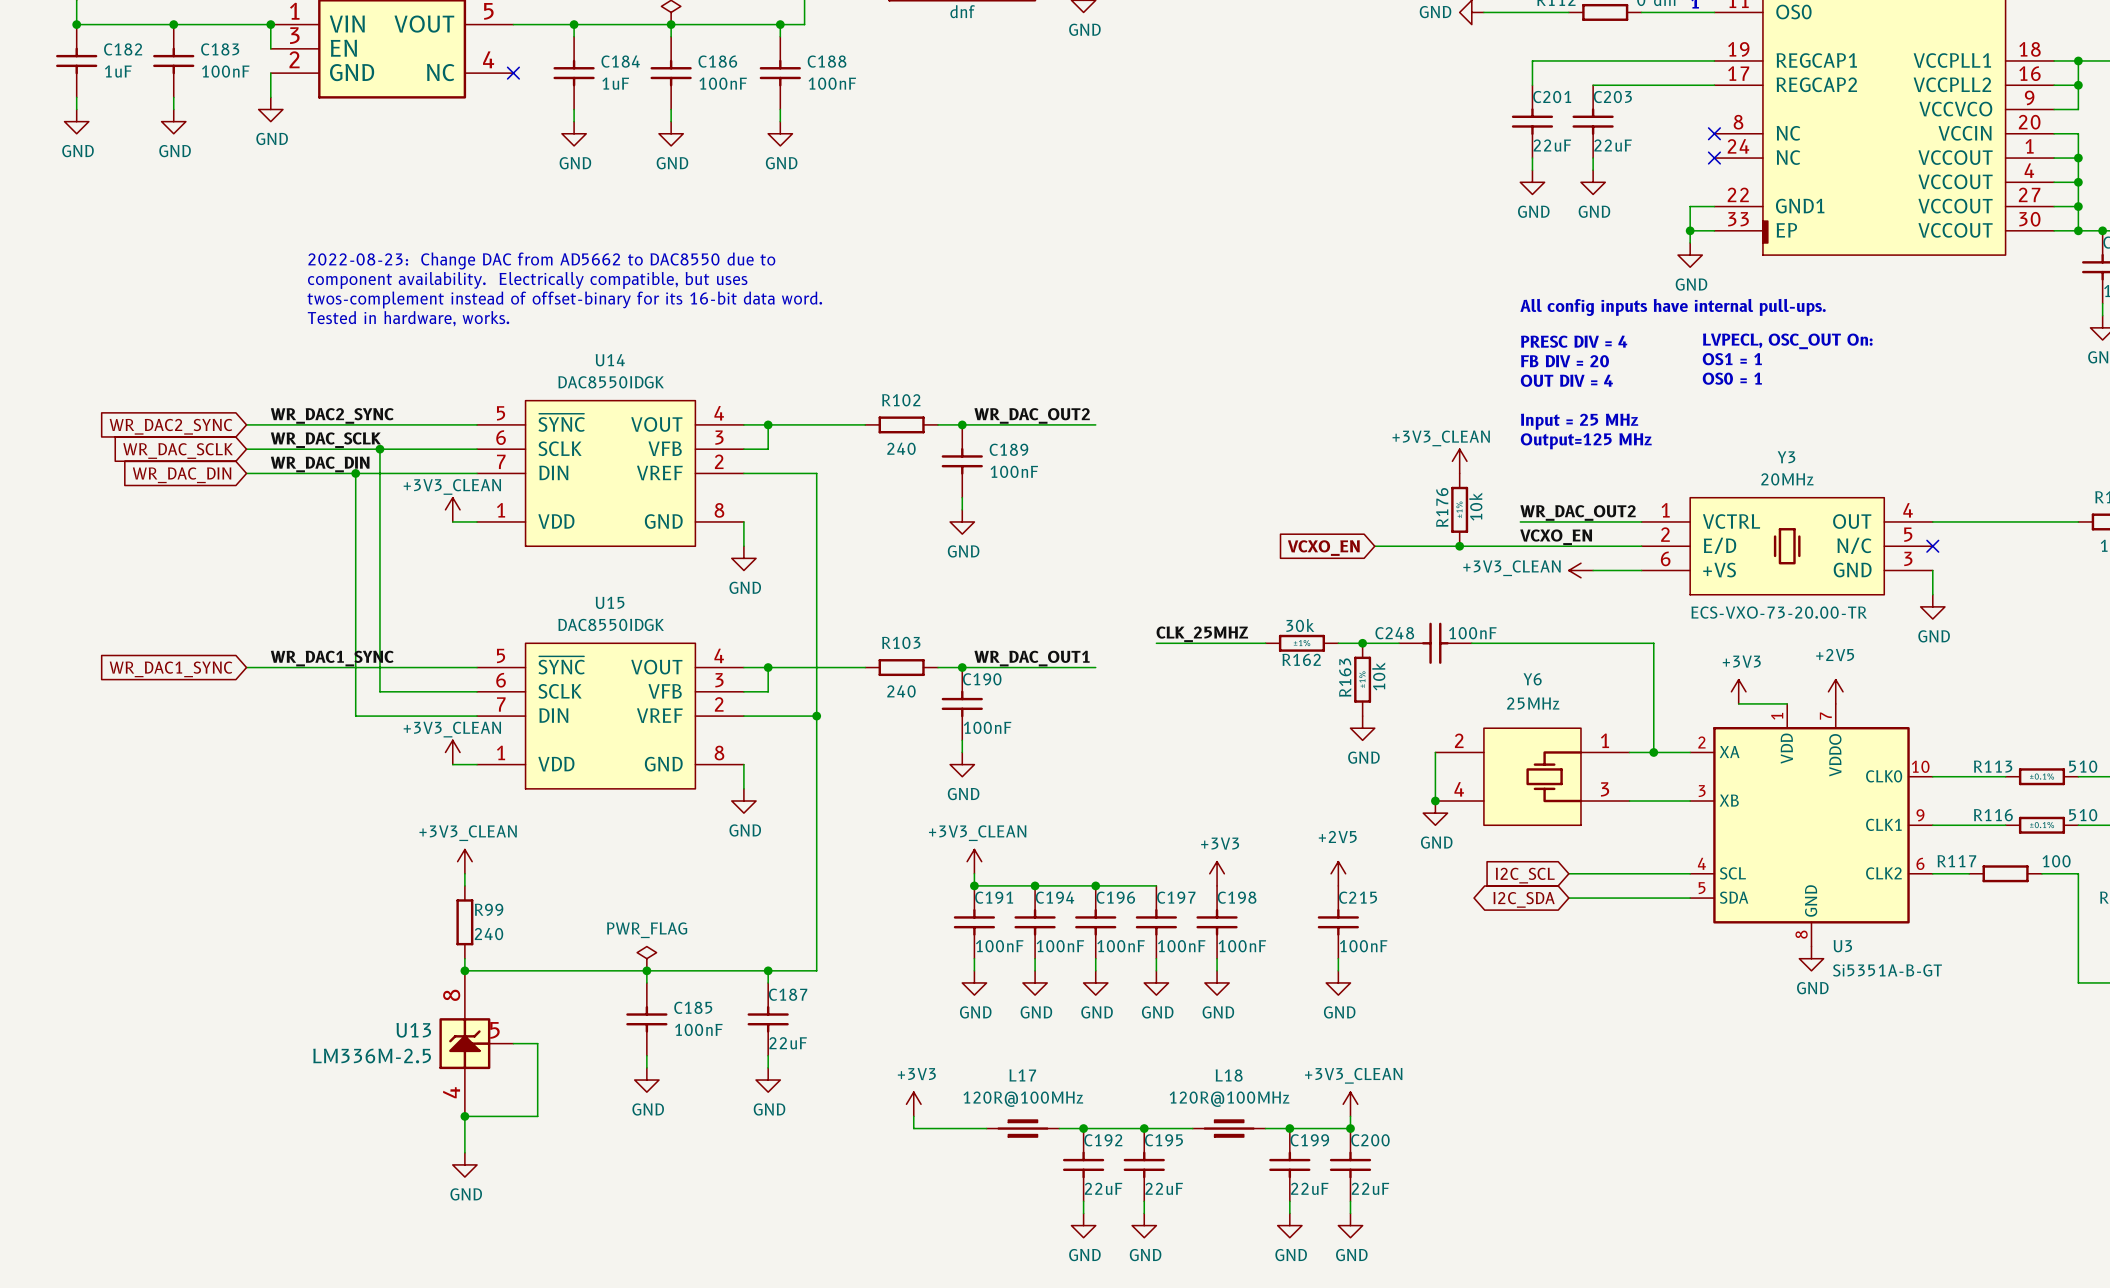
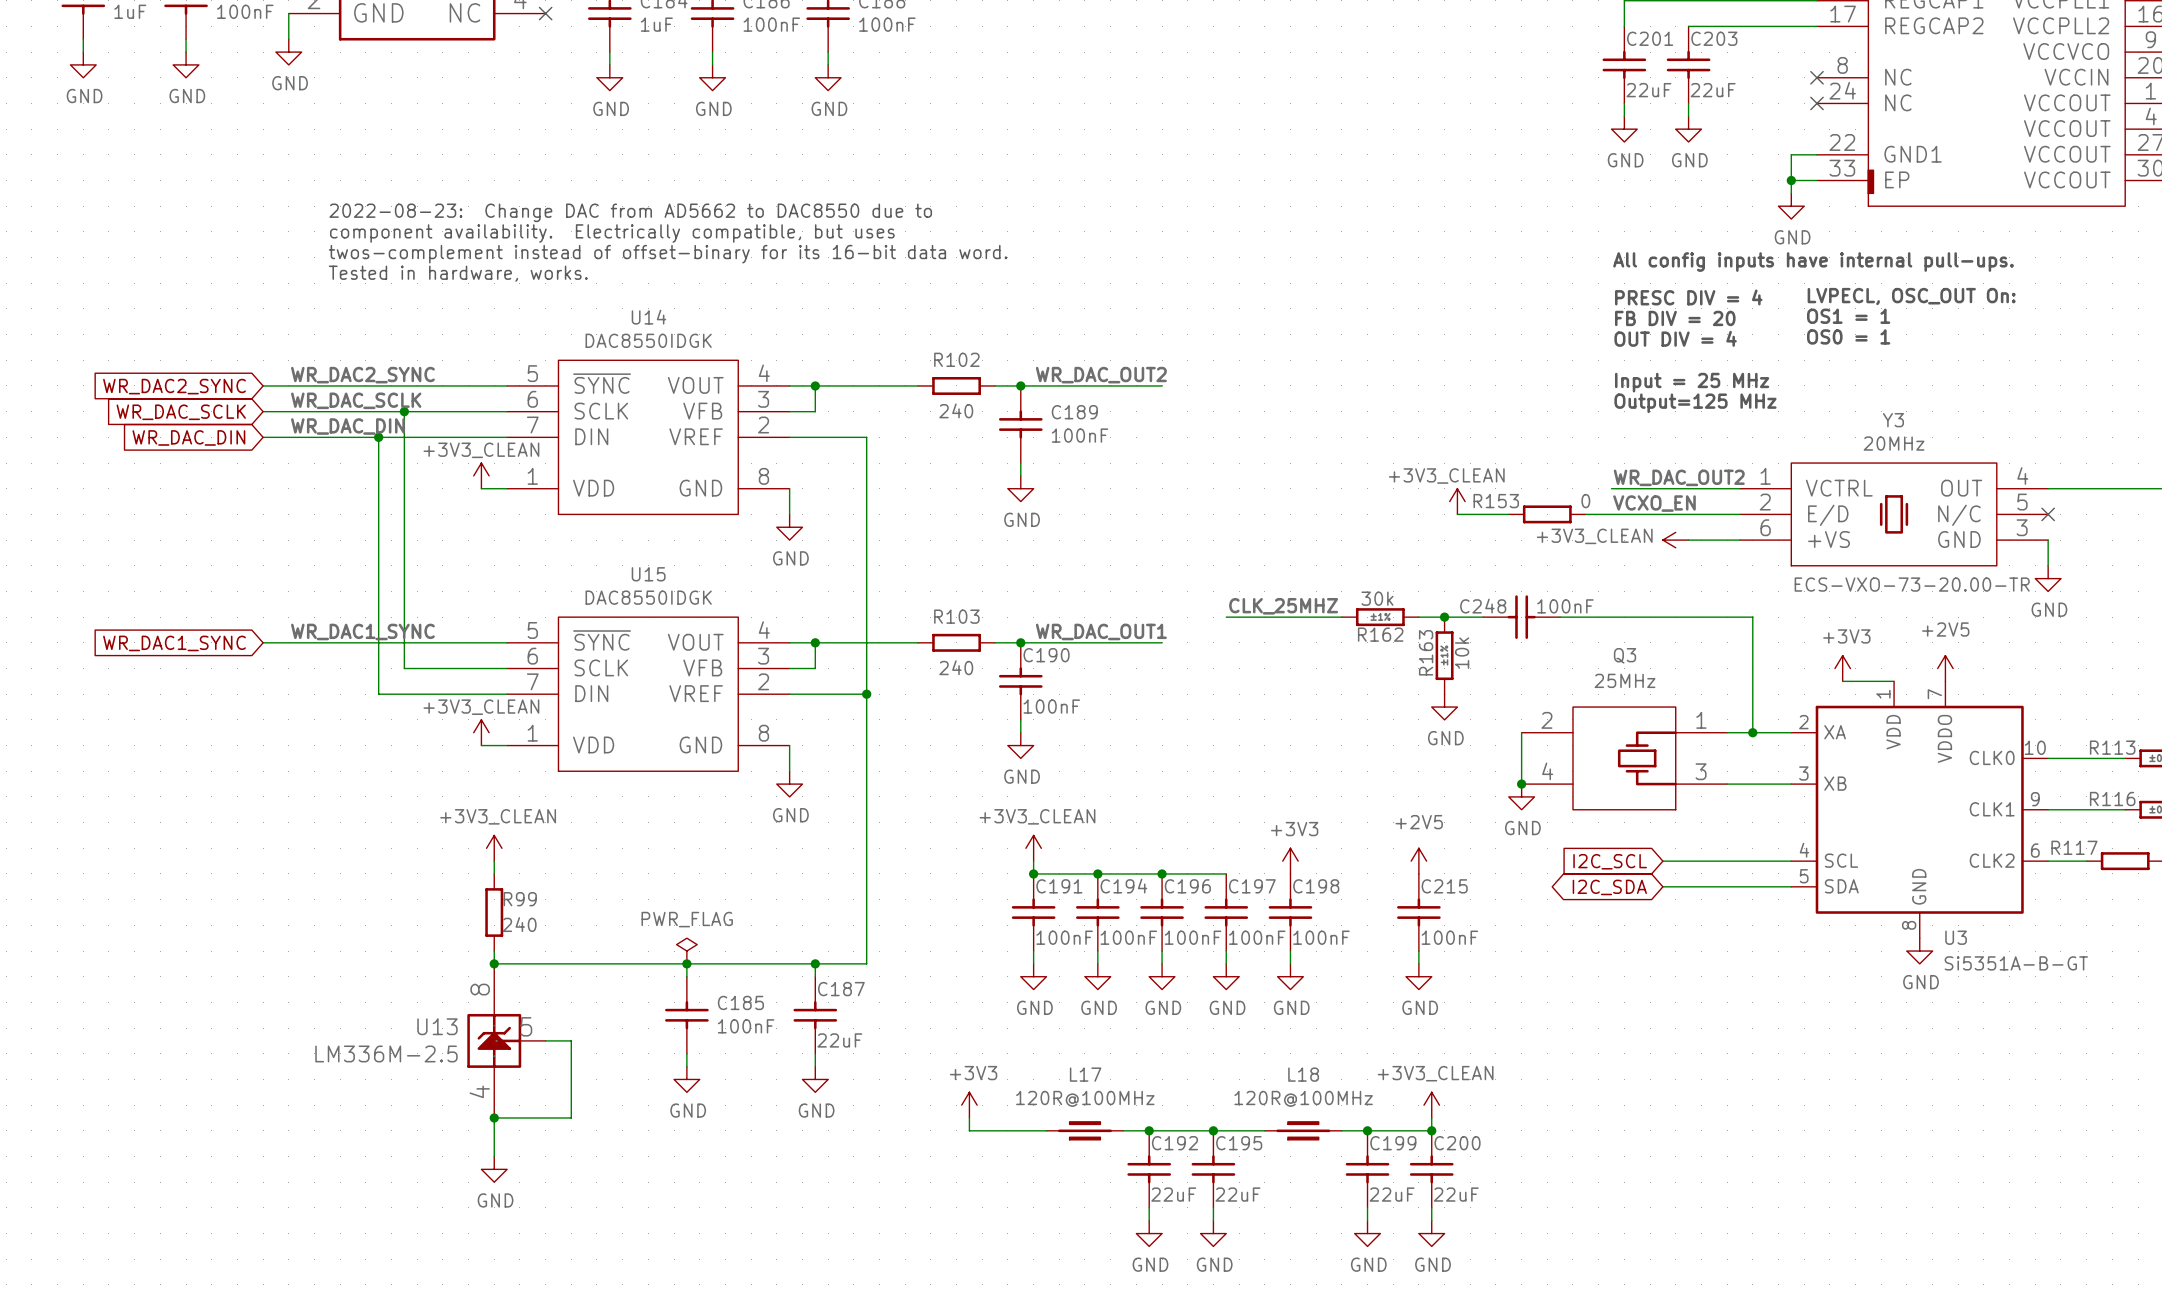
power symbol position: +3V3_CLEAN (1459, 461) -> +3V3_CLEAN (1457, 501)
R176: (1459, 509) -> none
wire: (1423, 546) (1496, 546) -> none
junction: (1459, 546) -> none
R153: none -> (1547, 514)
global label: VCXO_EN (1323, 548) -> none
Y6 name: Y6 (1532, 679) -> Q3 (1625, 655)

